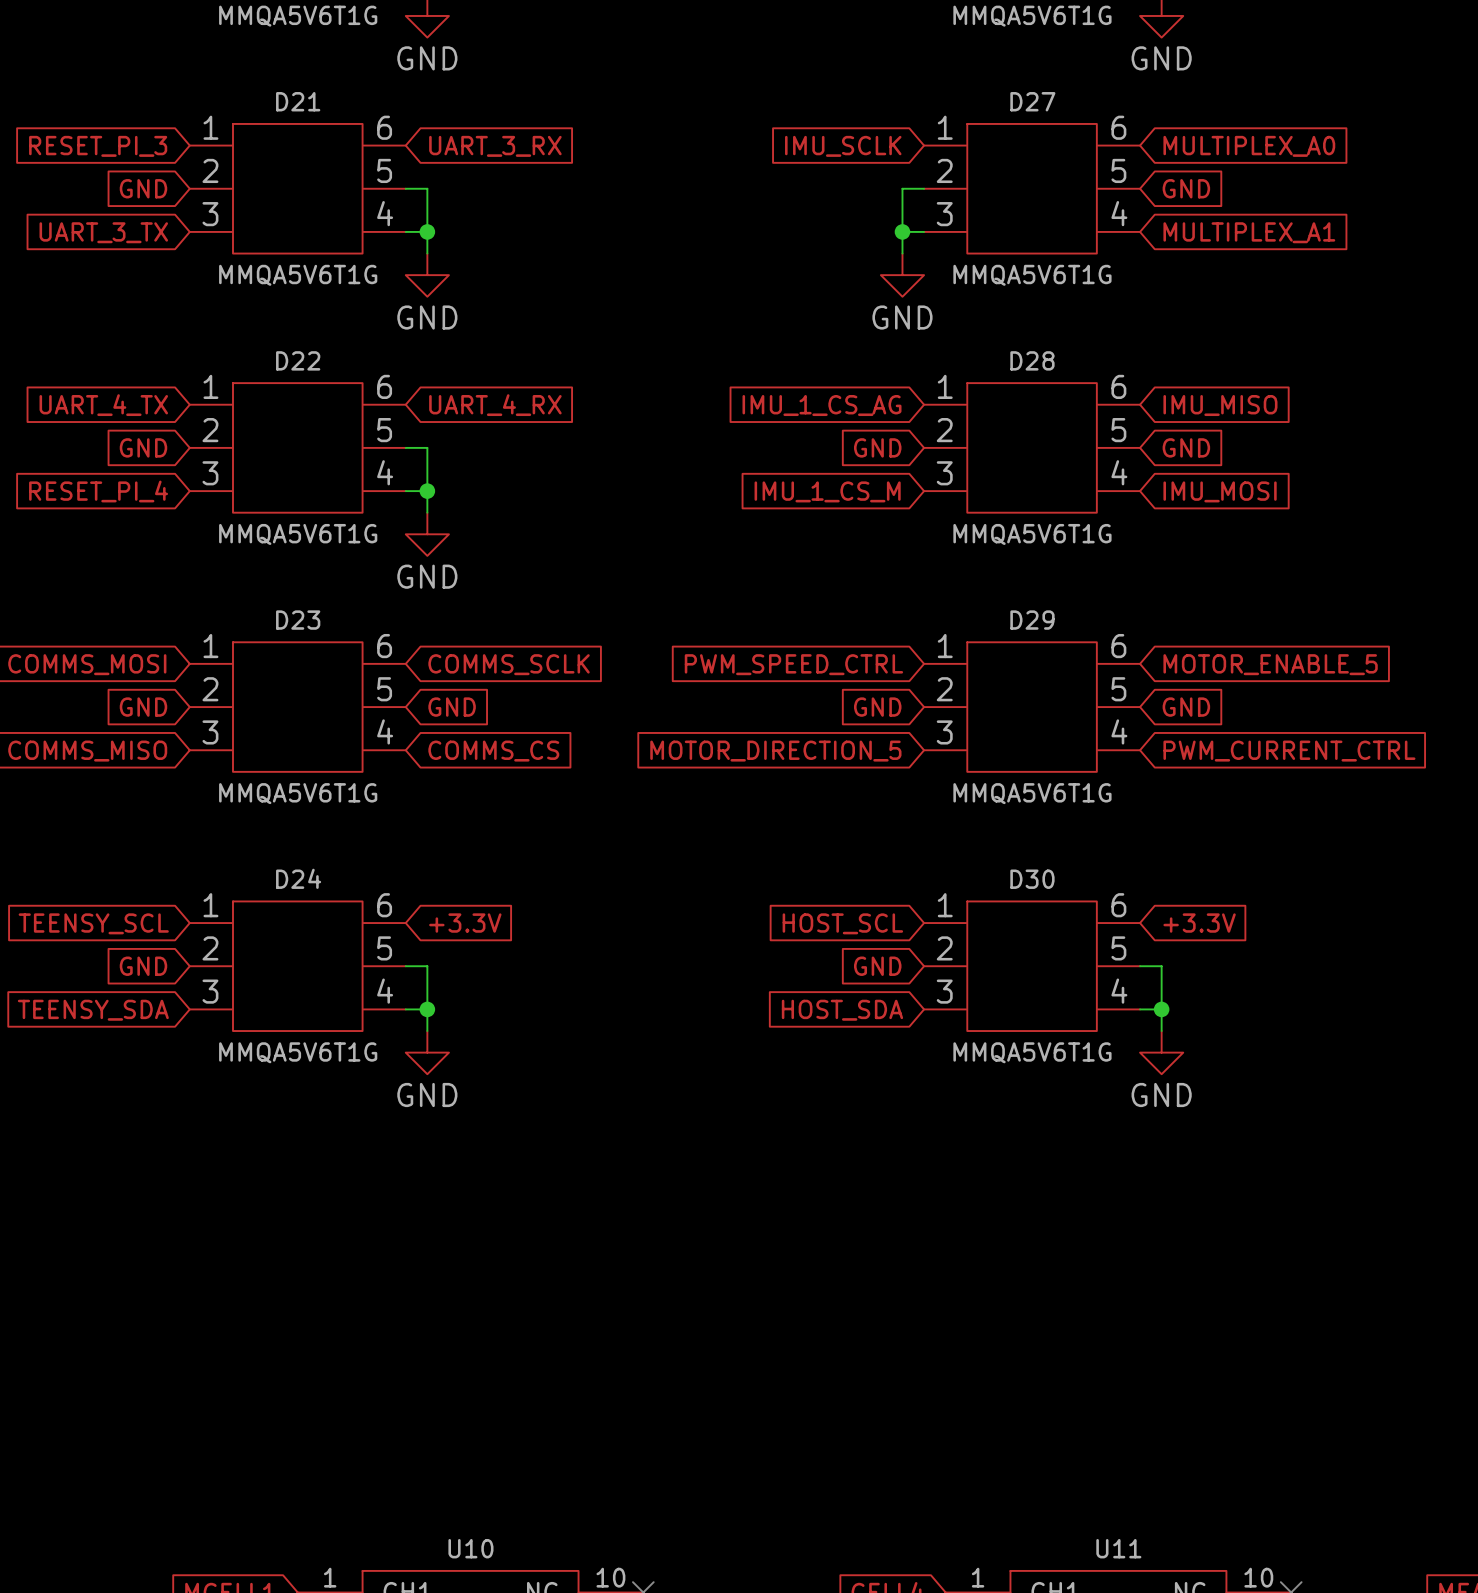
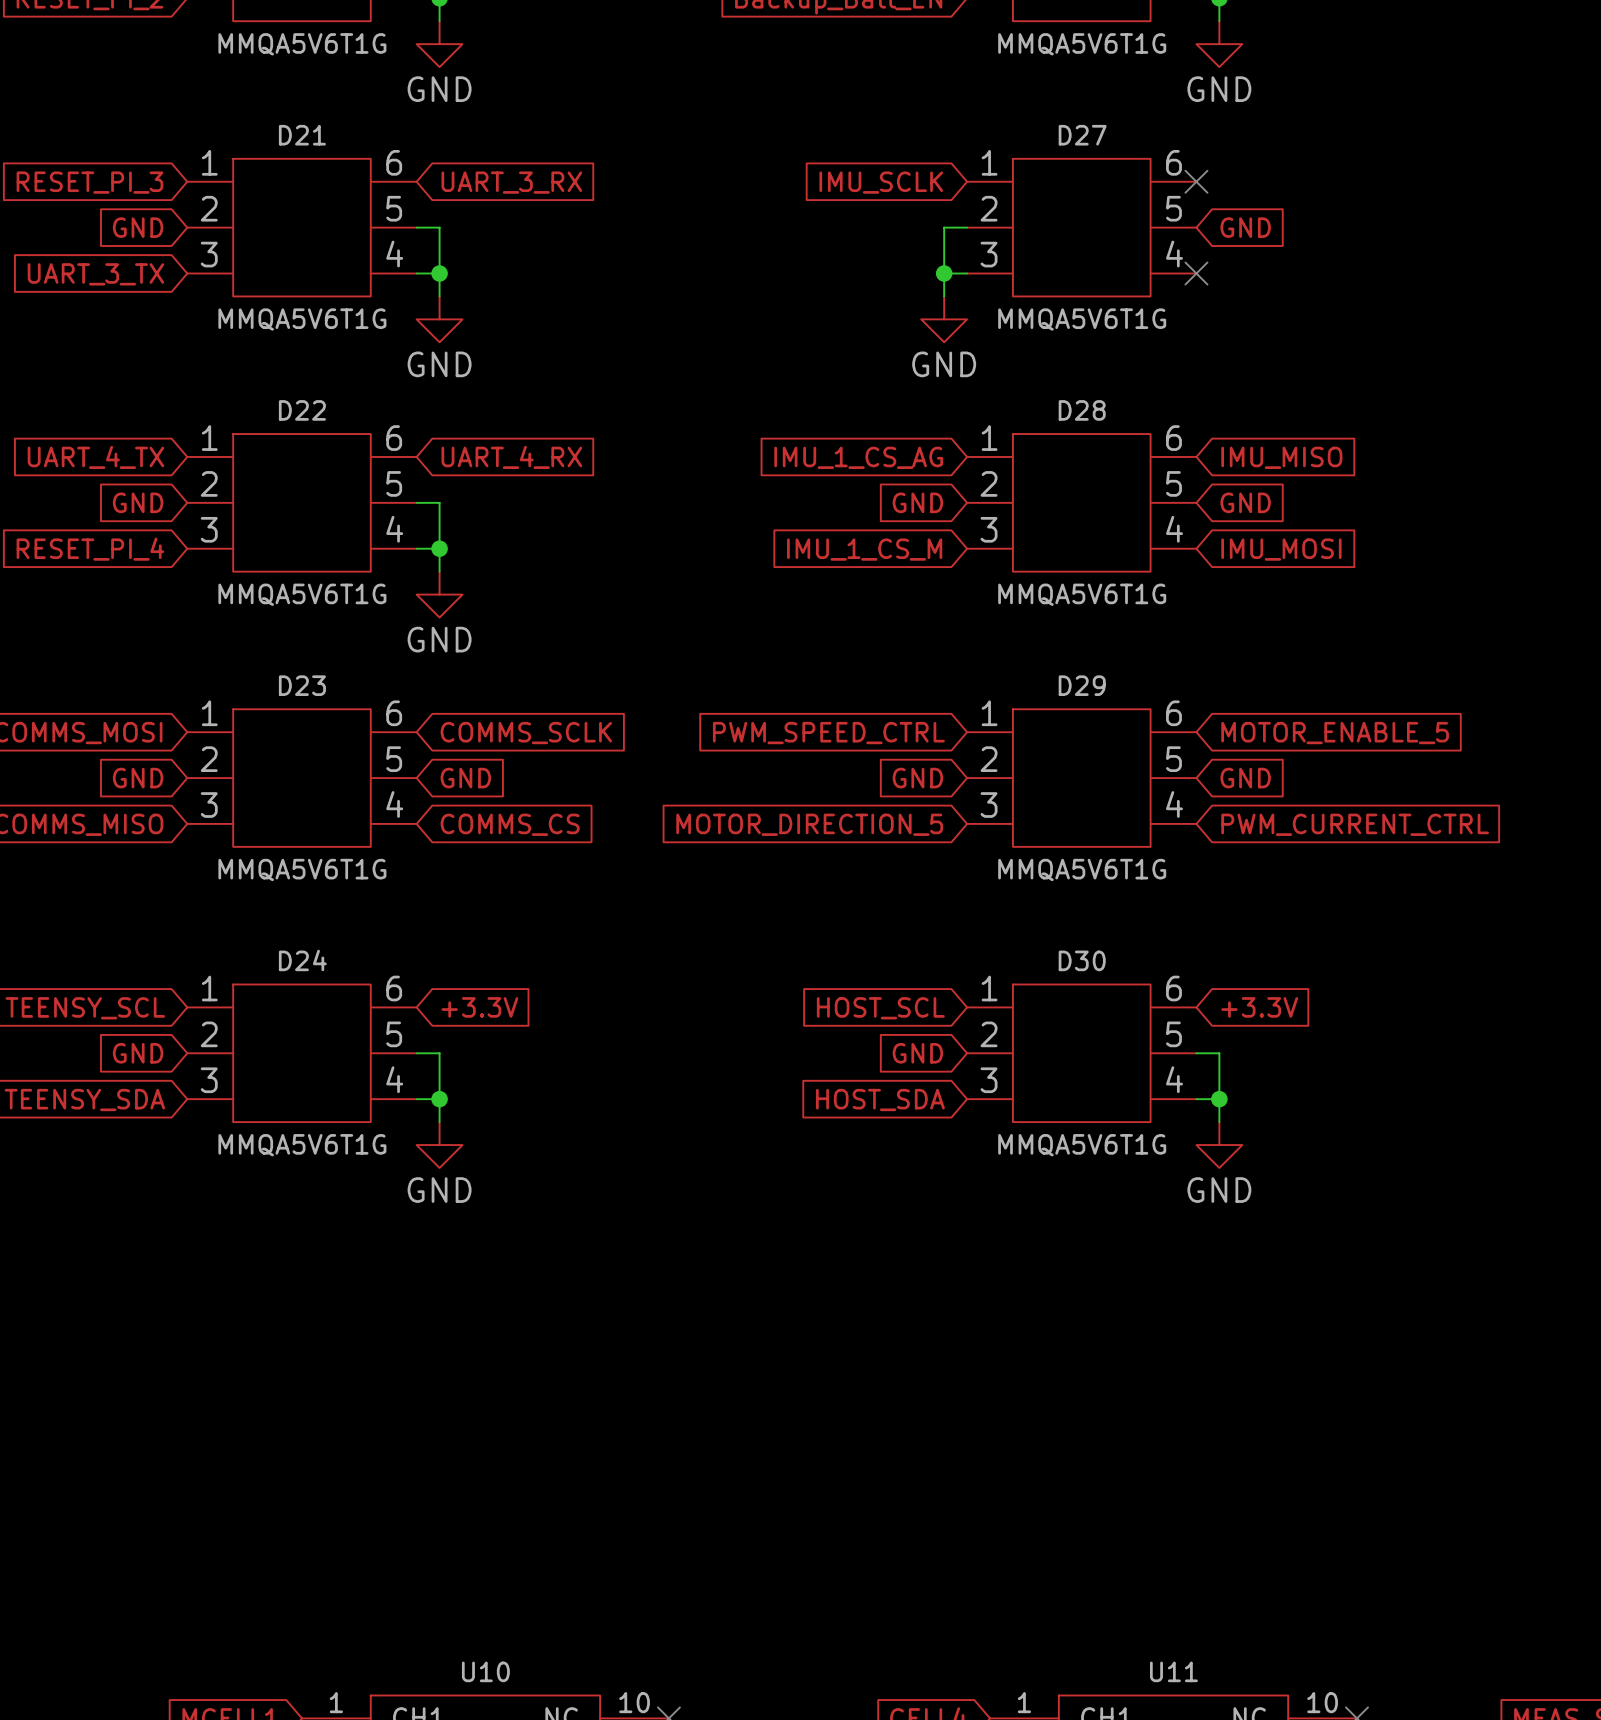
no-connect mark: none -> (1196, 181)
global label: MULTIPLEX_A0 (1249, 146) -> none
no-connect mark: none -> (1196, 273)
global label: MULTIPLEX_A1 (1249, 232) -> none

